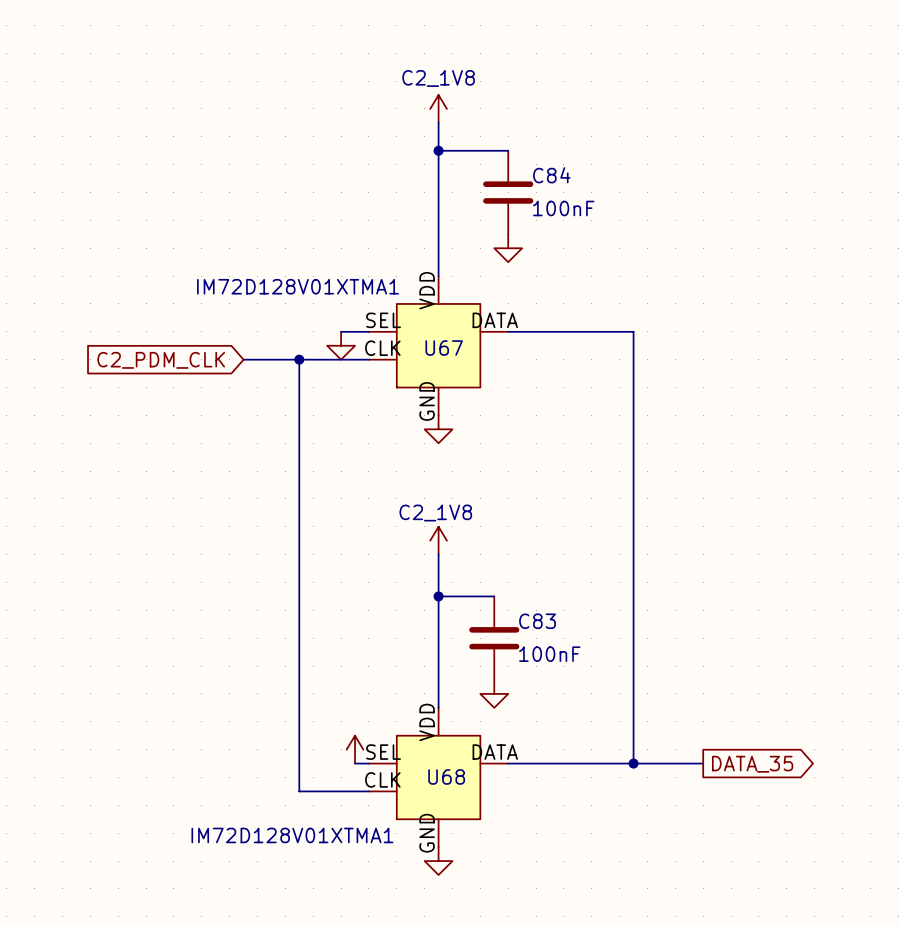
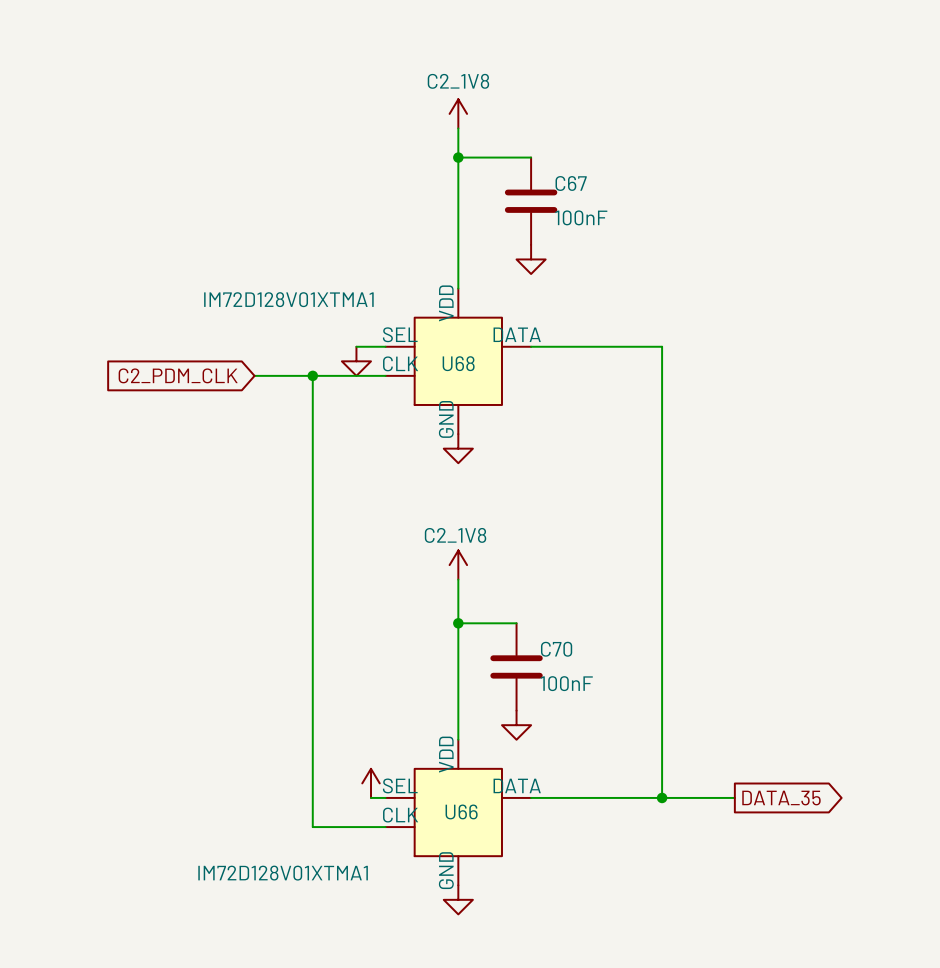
C84 name: C84 (551, 175) -> C67 (571, 183)
U67 name: U67 (444, 348) -> U68 (458, 363)
C83 name: C83 (537, 621) -> C70 (556, 649)
U68 name: U68 (446, 776) -> U66 (461, 811)

